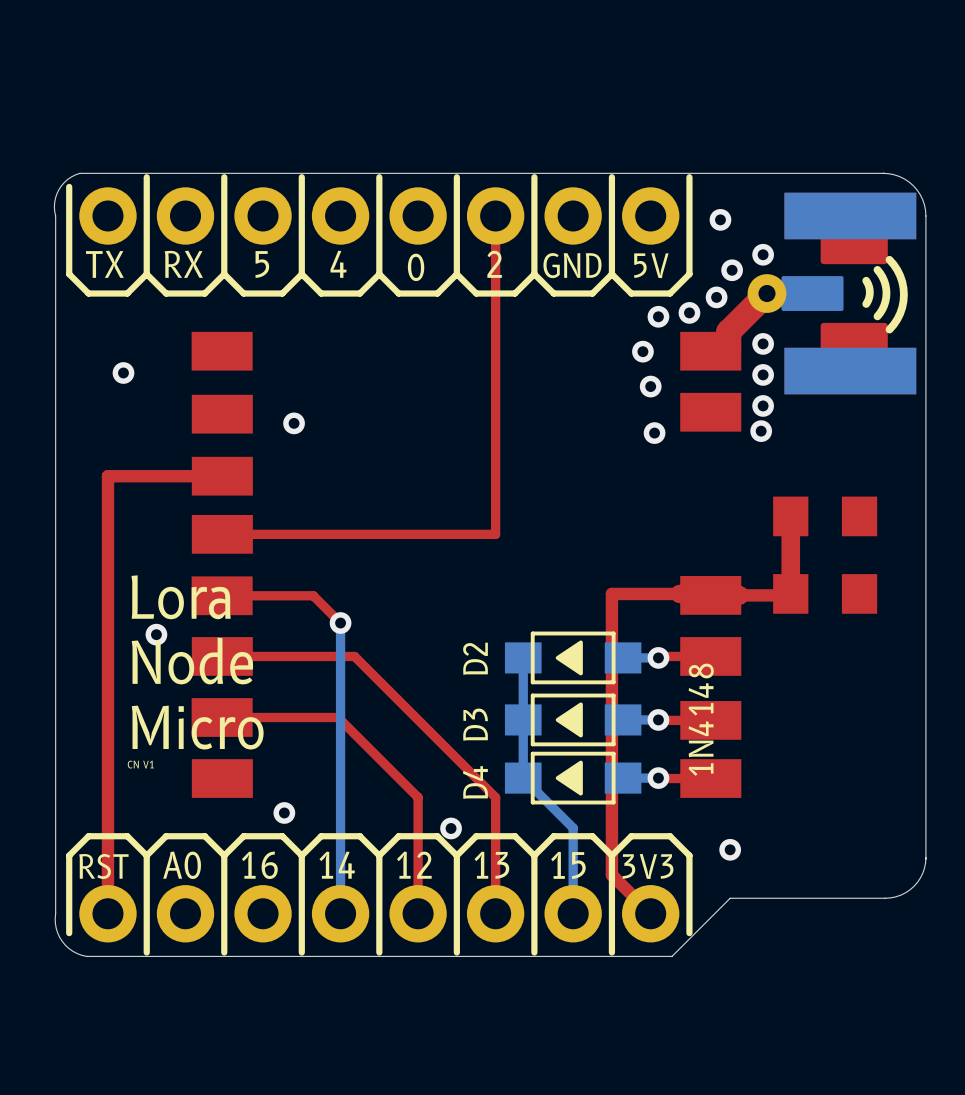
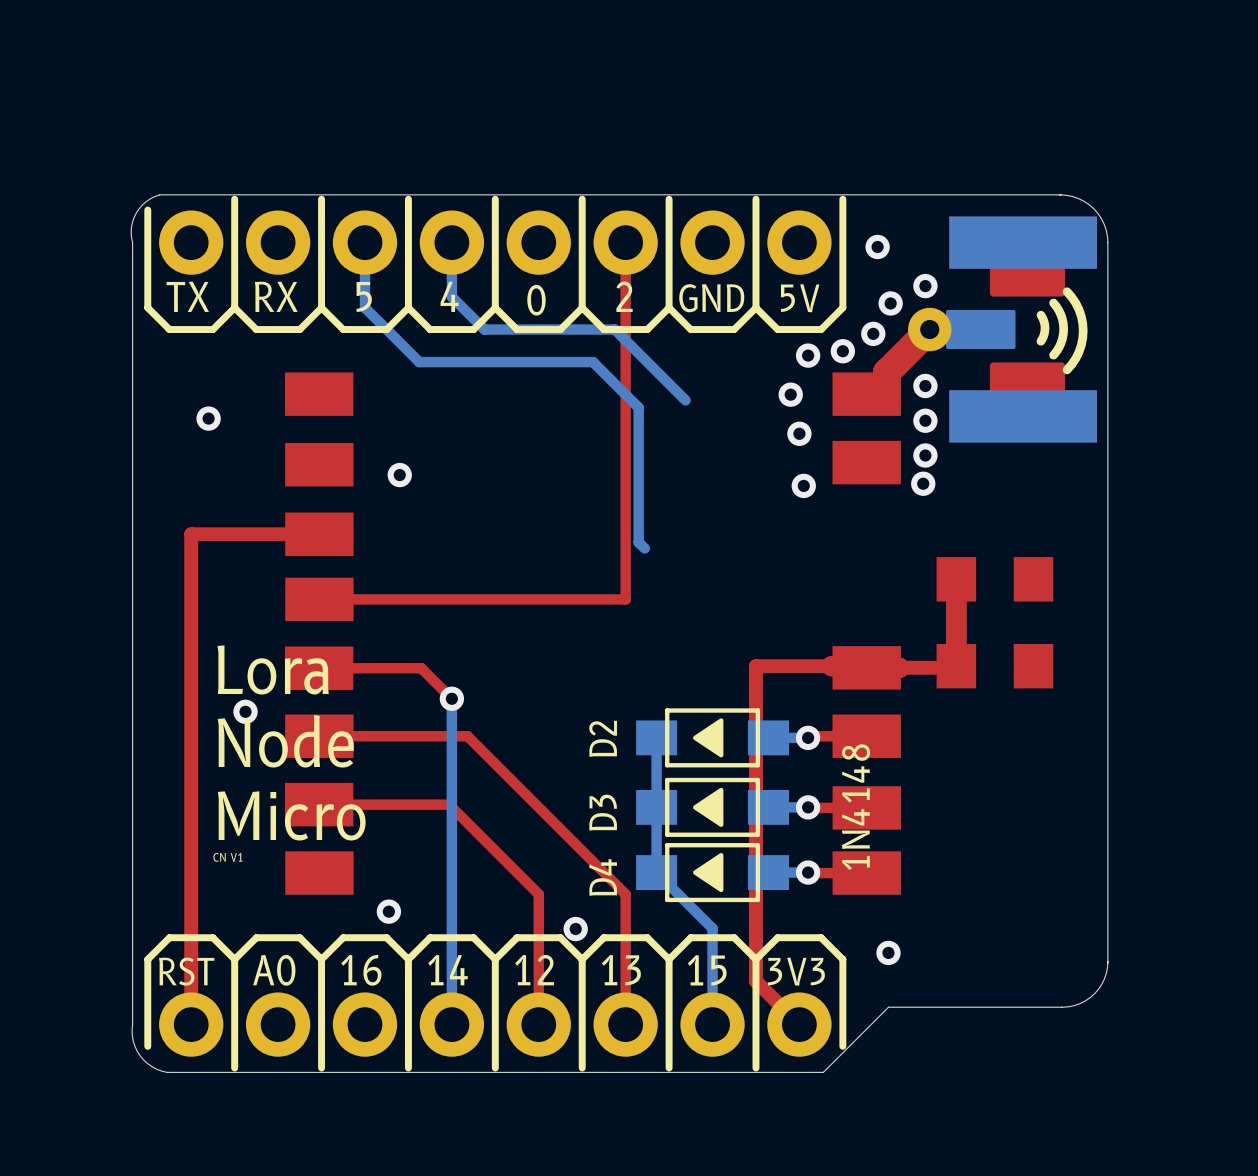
bottom track: none -> (364, 242) (364, 307) (419, 362) (593, 362) (638, 407) (638, 542) (644, 548)
bottom track: none -> (451, 242) (451, 296) (484, 329) (614, 329) (685, 400)

